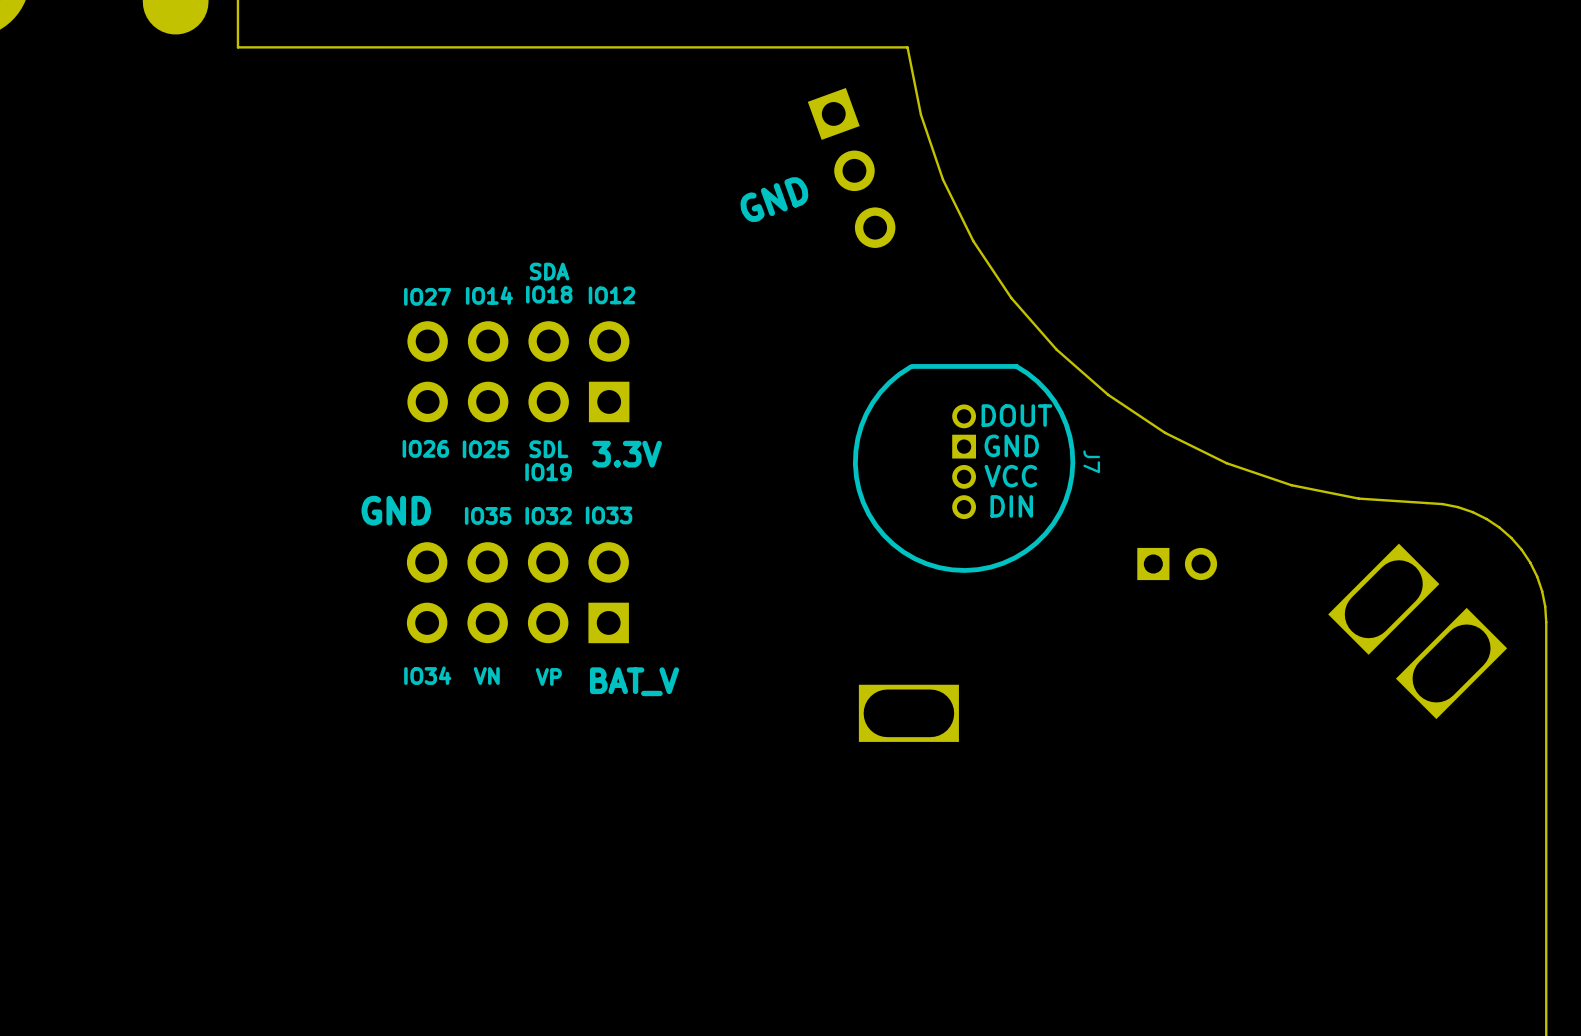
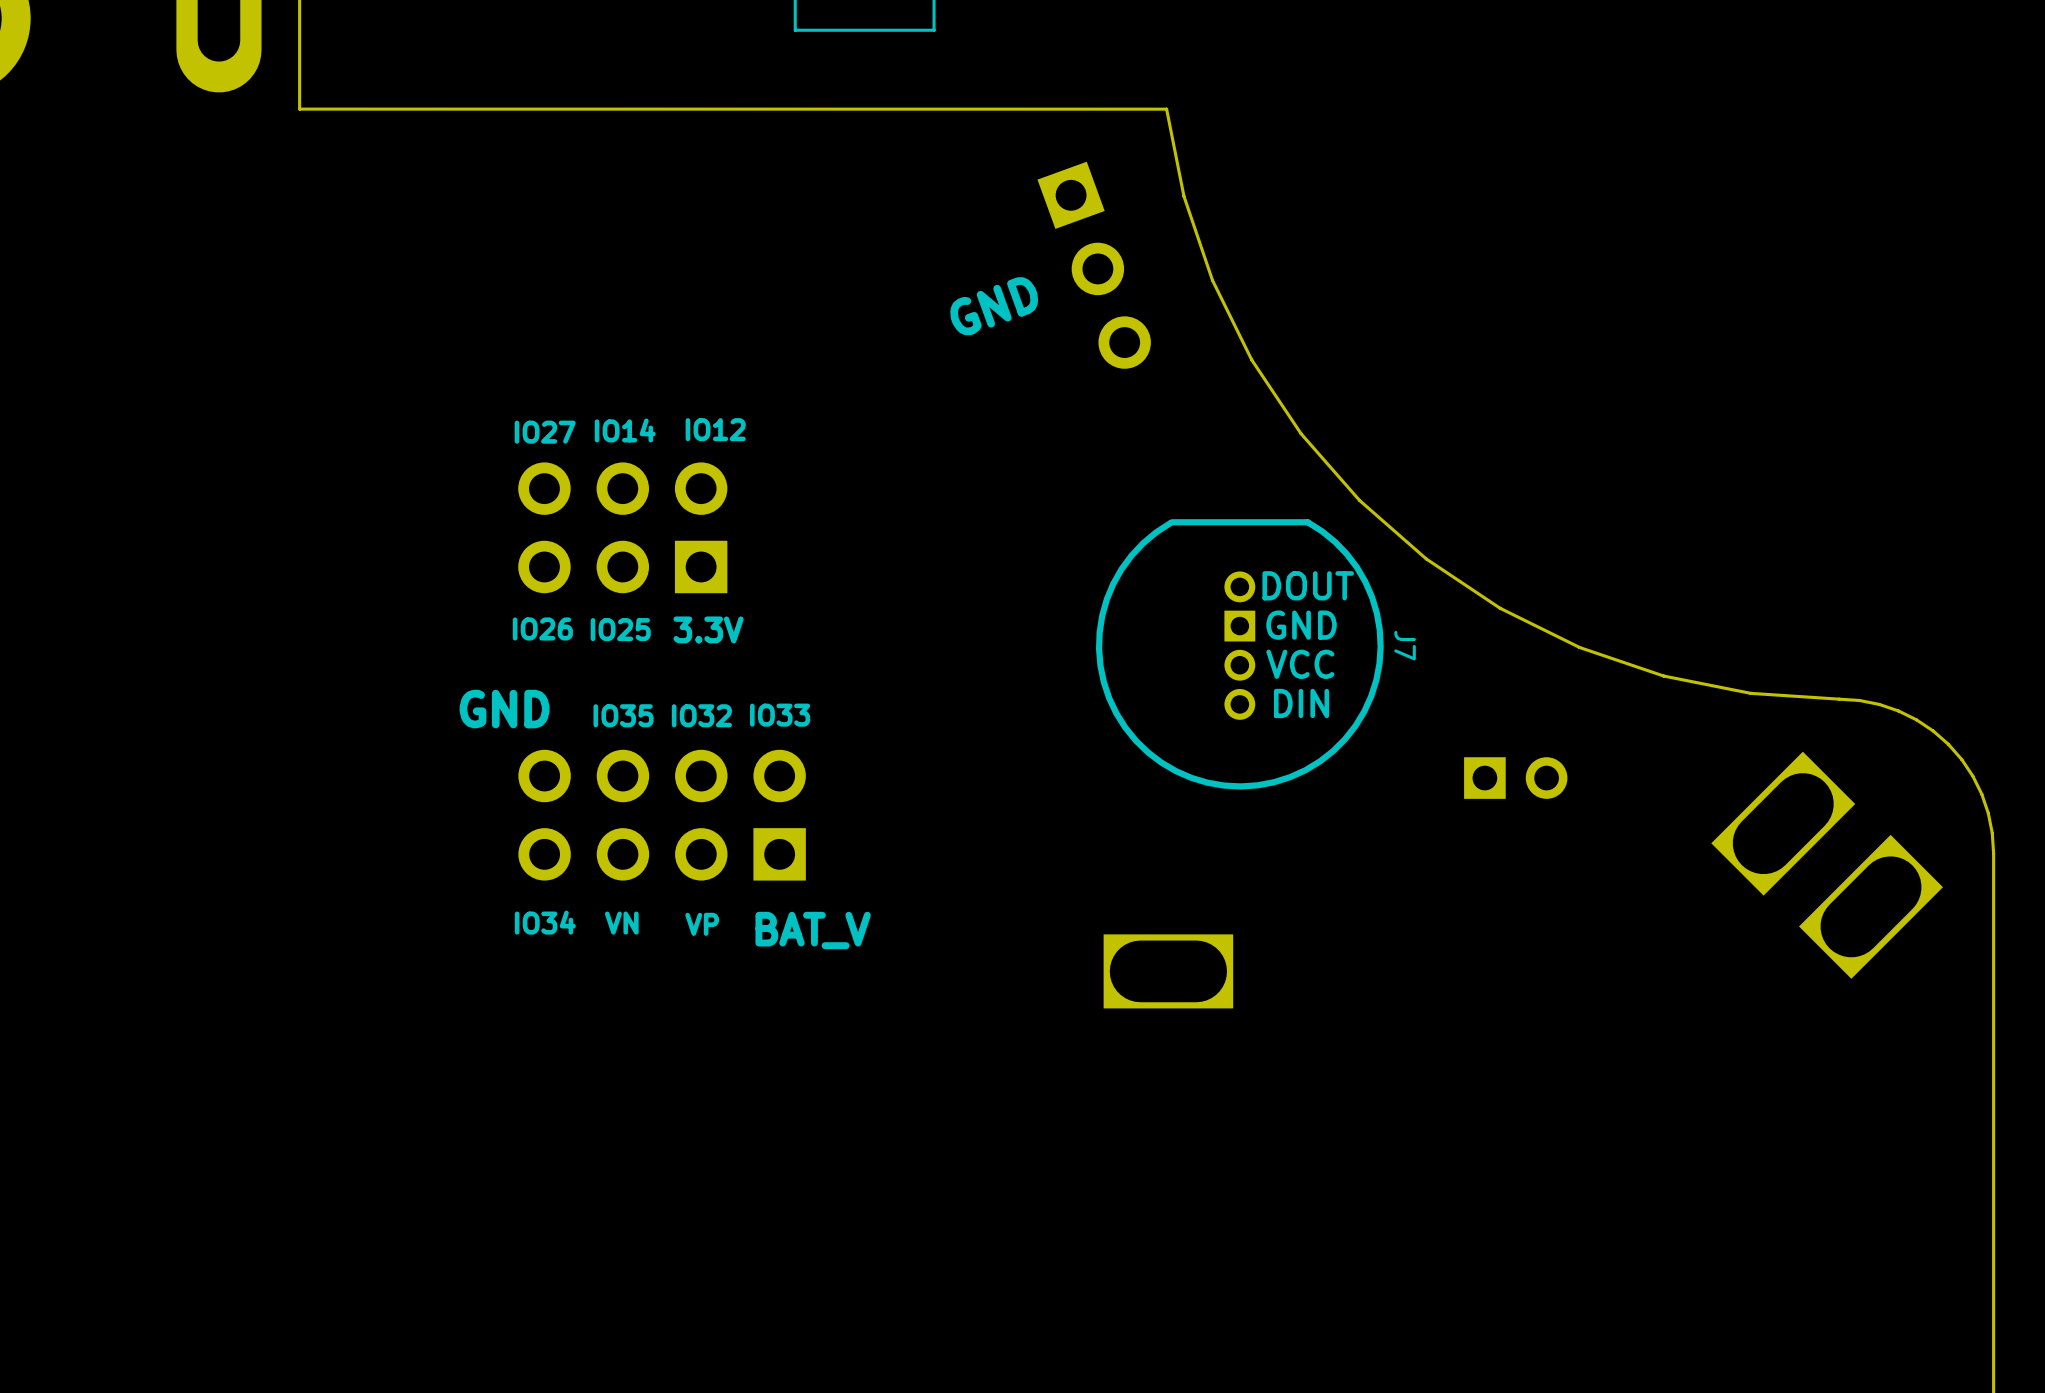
text: SDA (549, 271) -> none
text: IO18 (549, 294) -> IO12 (715, 429)
text: IO12 (611, 295) -> none
part: none -> (622, 527)
part: (518, 371) -> none
text: SDL (548, 449) -> 3.3V (708, 629)
text: 3.3V (627, 454) -> none
text: IO19 (548, 472) -> none

